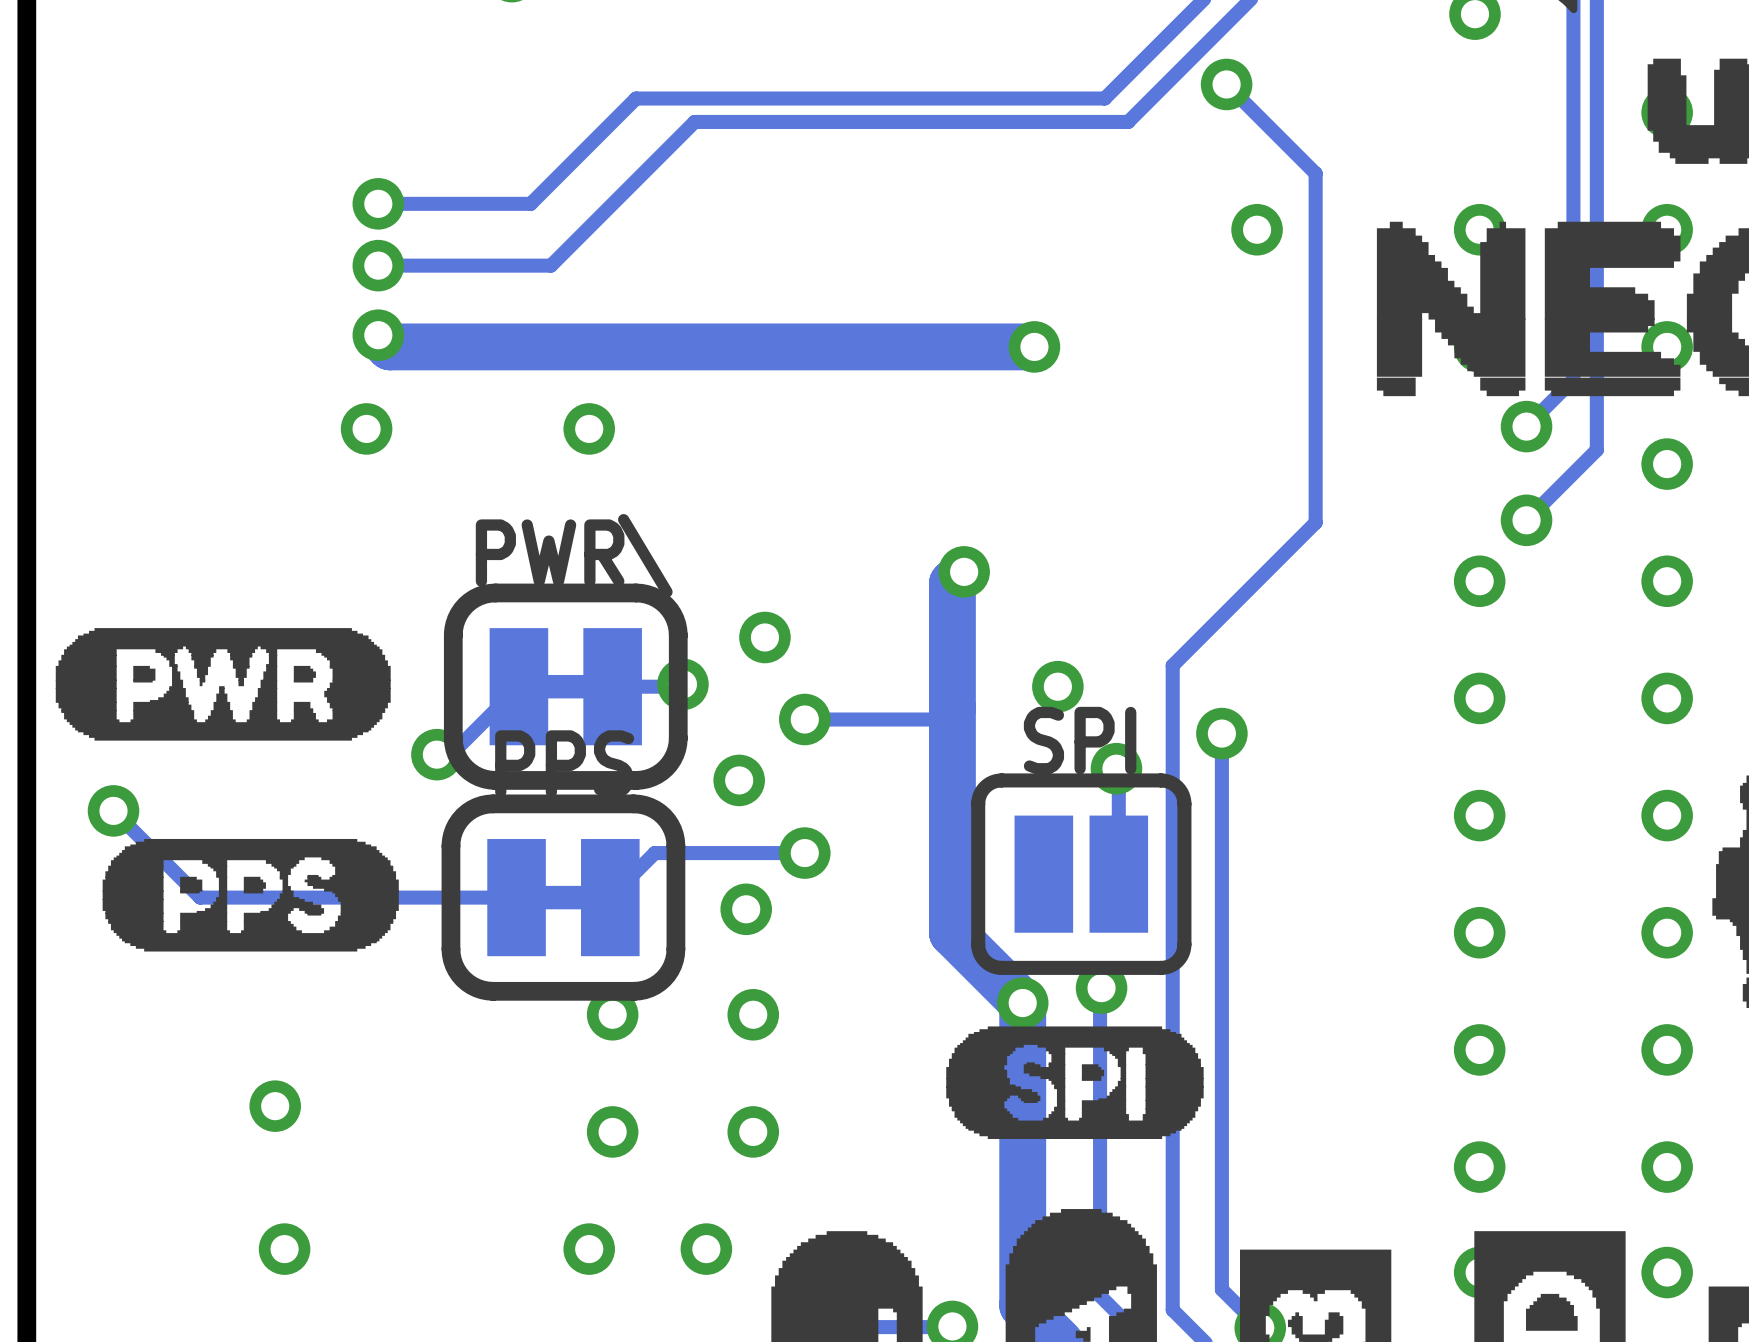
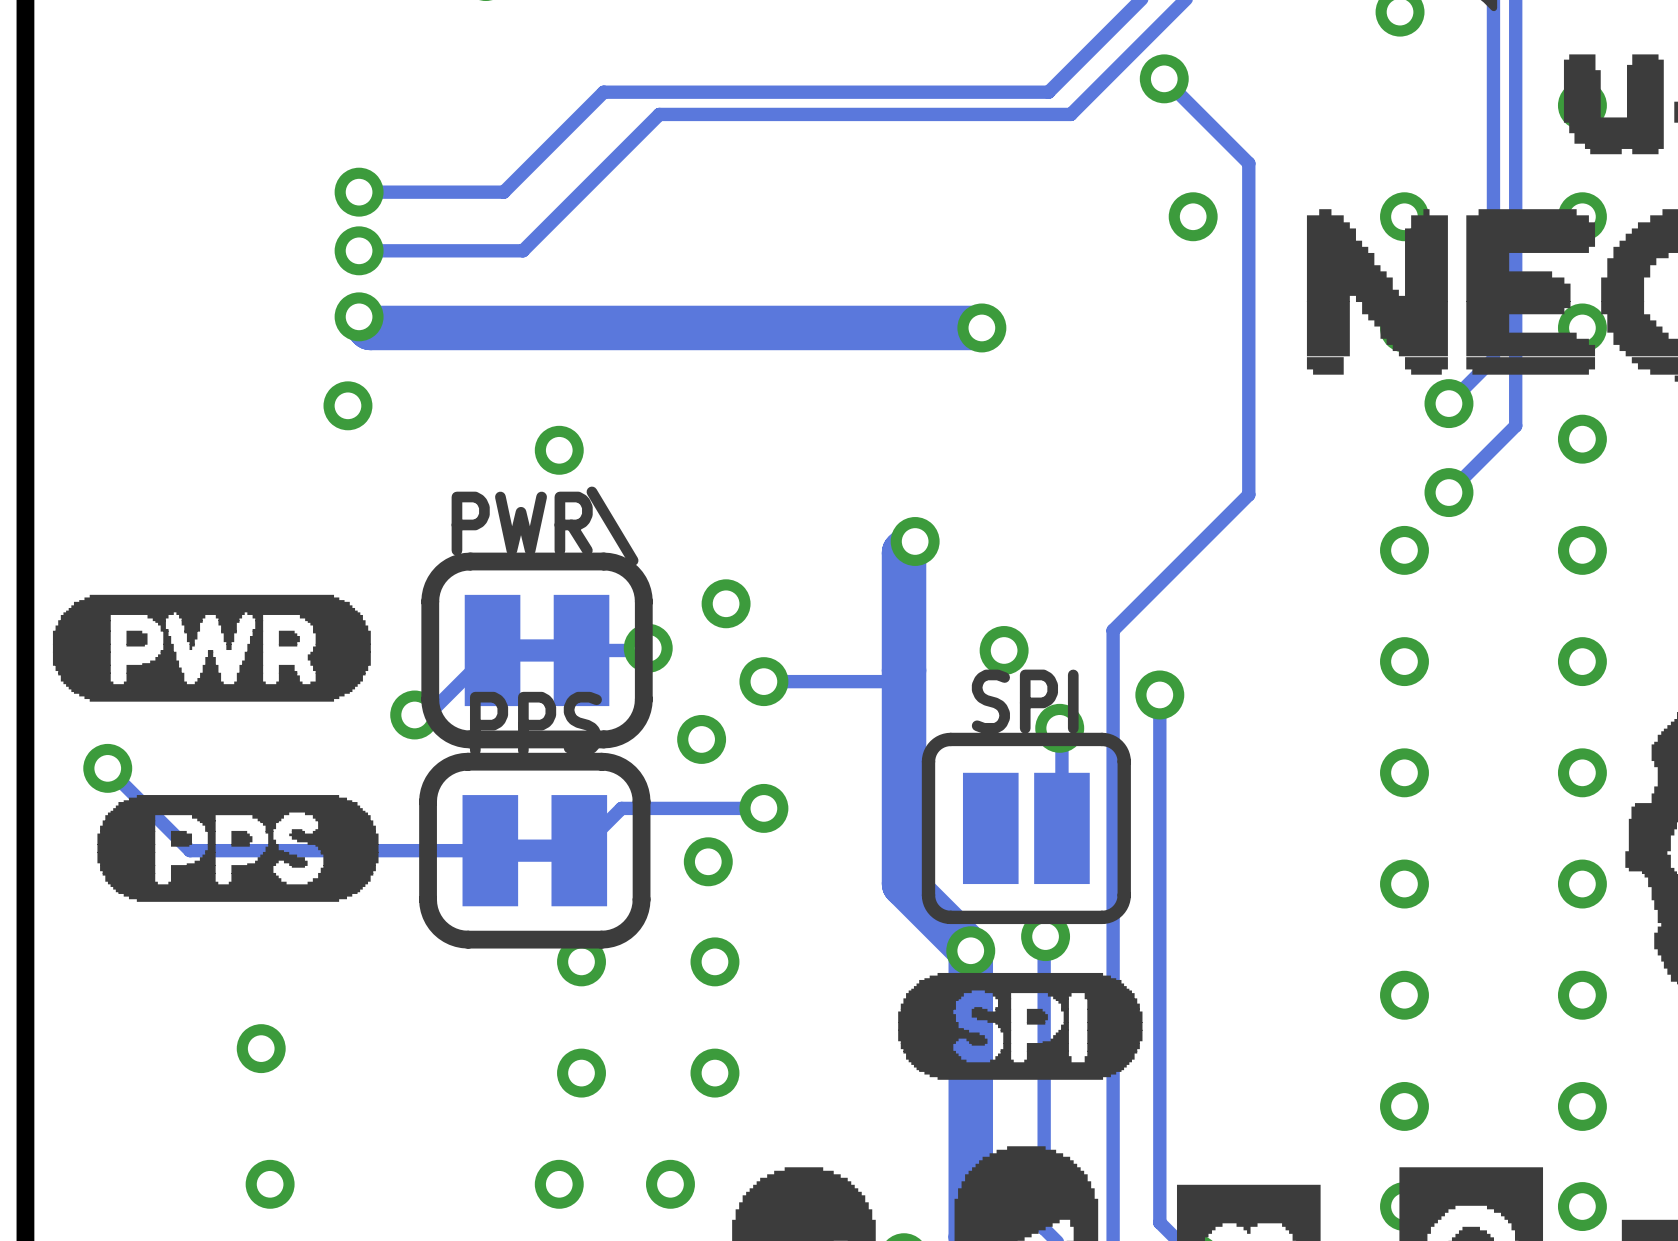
via position: (589, 428) -> (559, 450)

